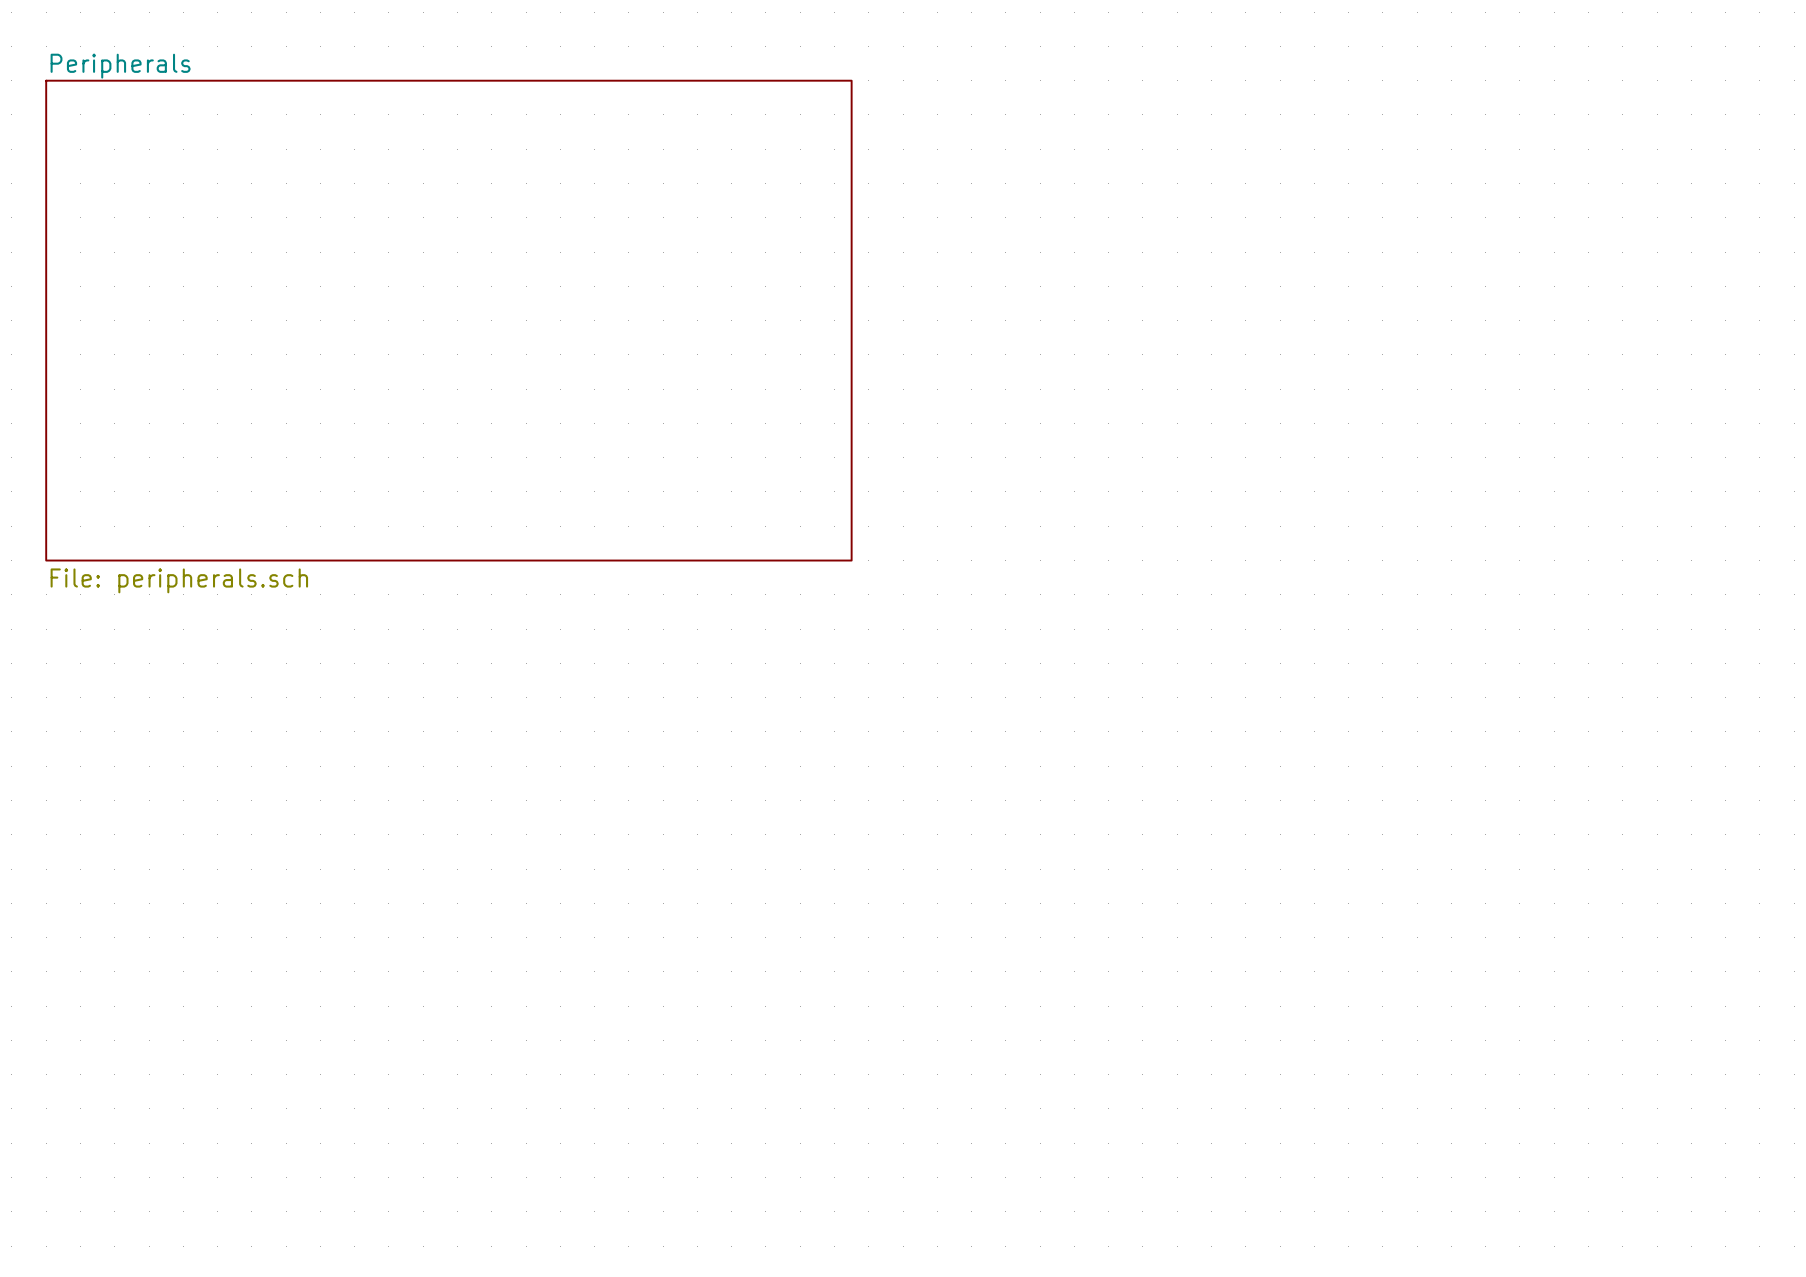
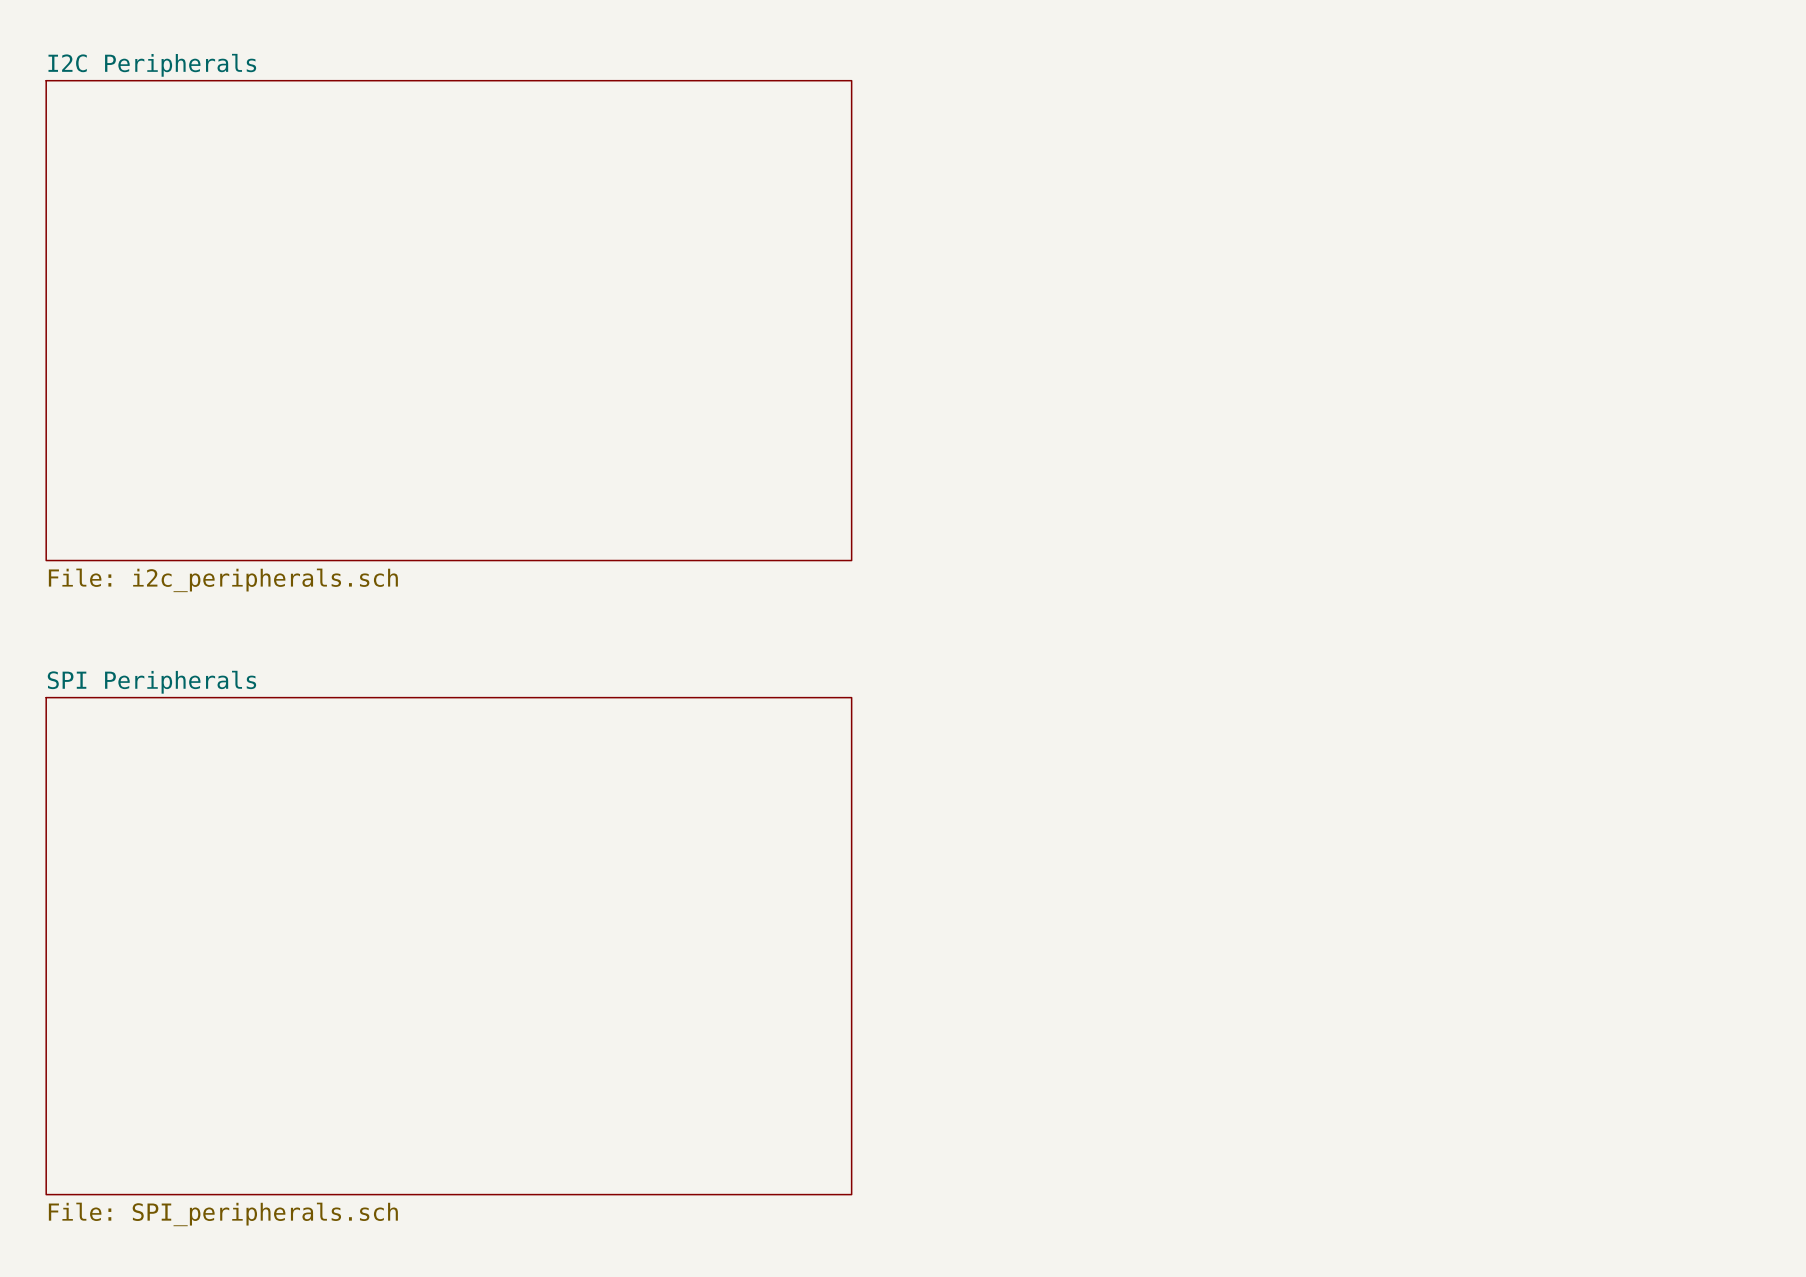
sheet Peripherals name: Peripherals (120, 66) -> I2C Peripherals (152, 65)
sheet Peripherals value: File: peripherals.sch (179, 580) -> File: i2c_peripherals.sch (223, 580)
sheet SPI Peripherals: none -> File: SPI_peripherals.sch (448, 946)

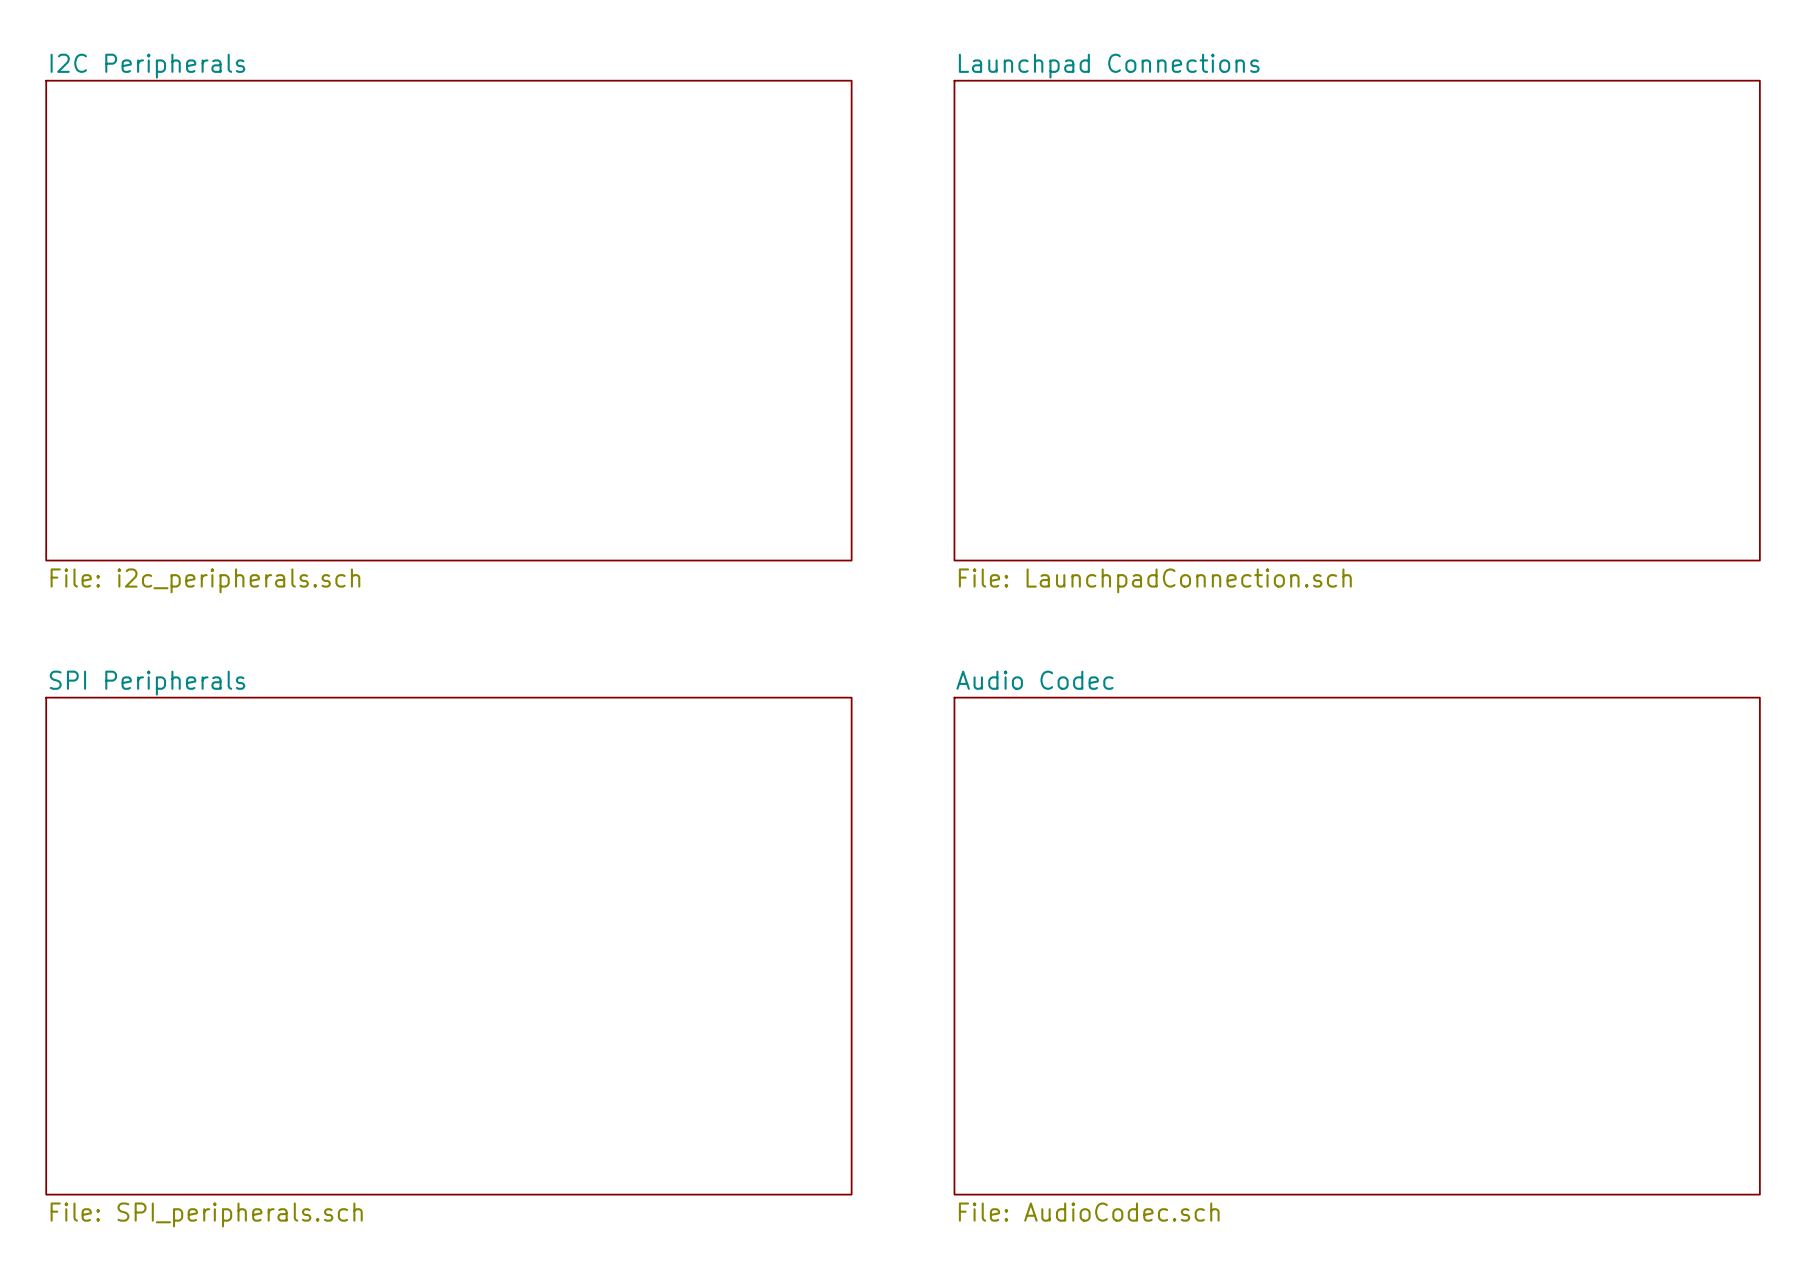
sheet Launchpad Connections: none -> File: LaunchpadConnection.sch (1357, 320)
sheet Audio Codec: none -> File: AudioCodec.sch (1357, 946)

